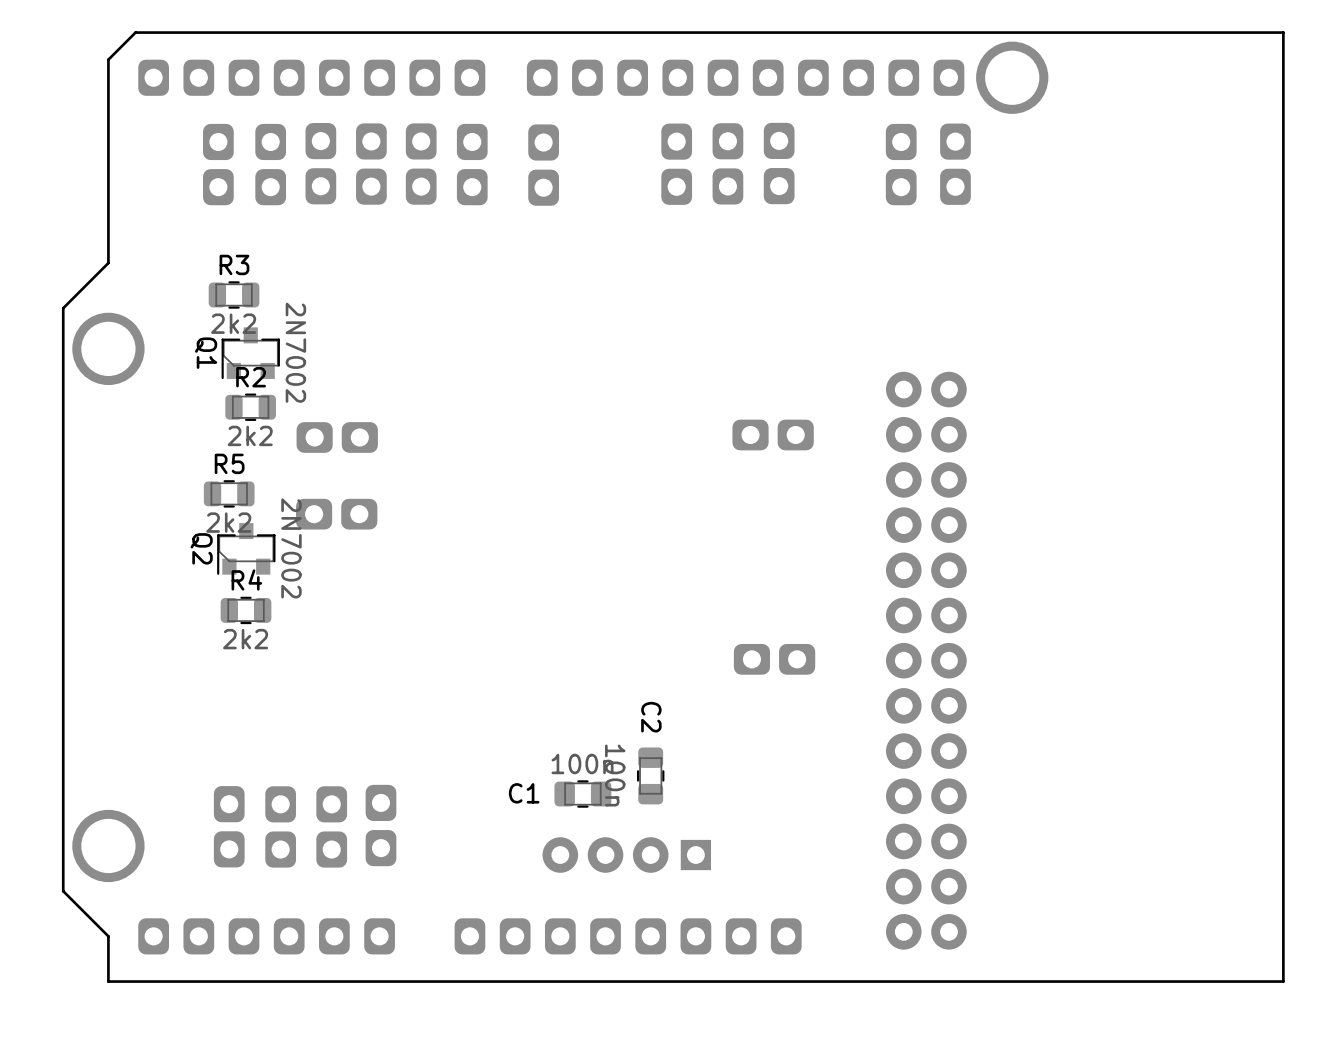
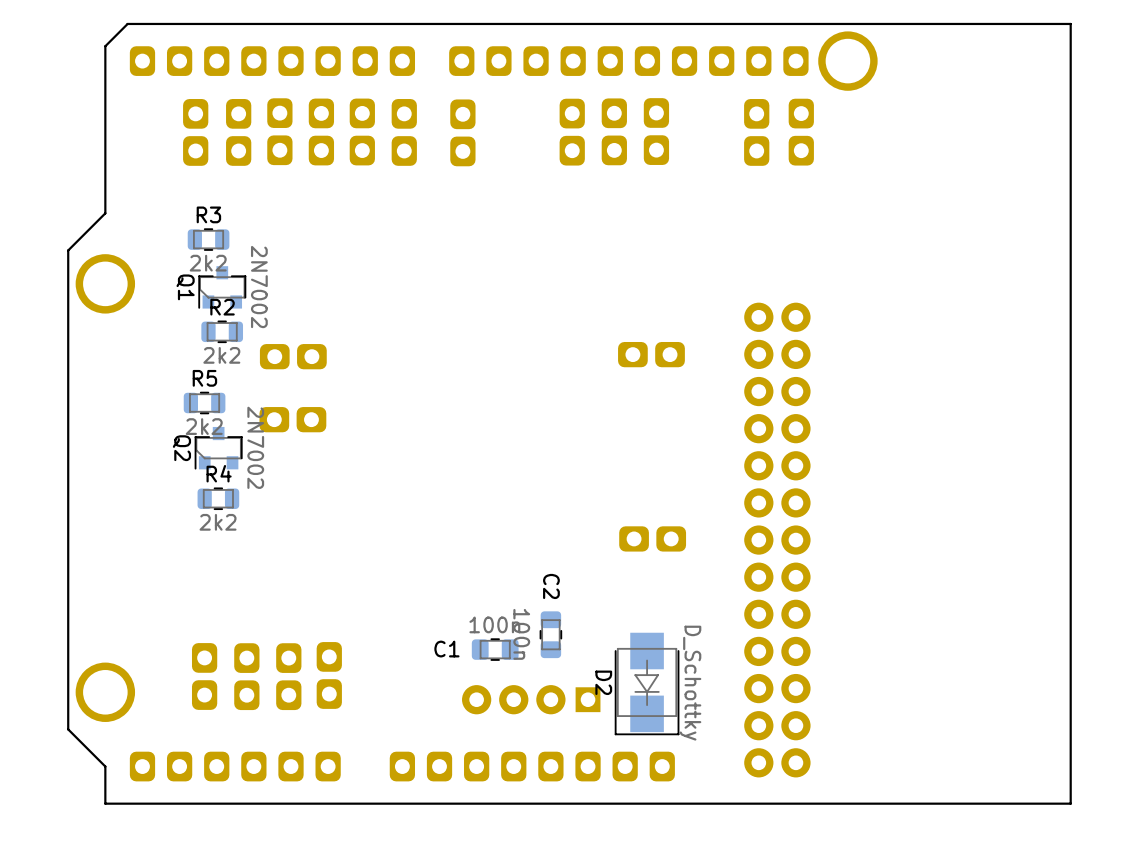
D2: none -> D_Schottky (647, 683)

